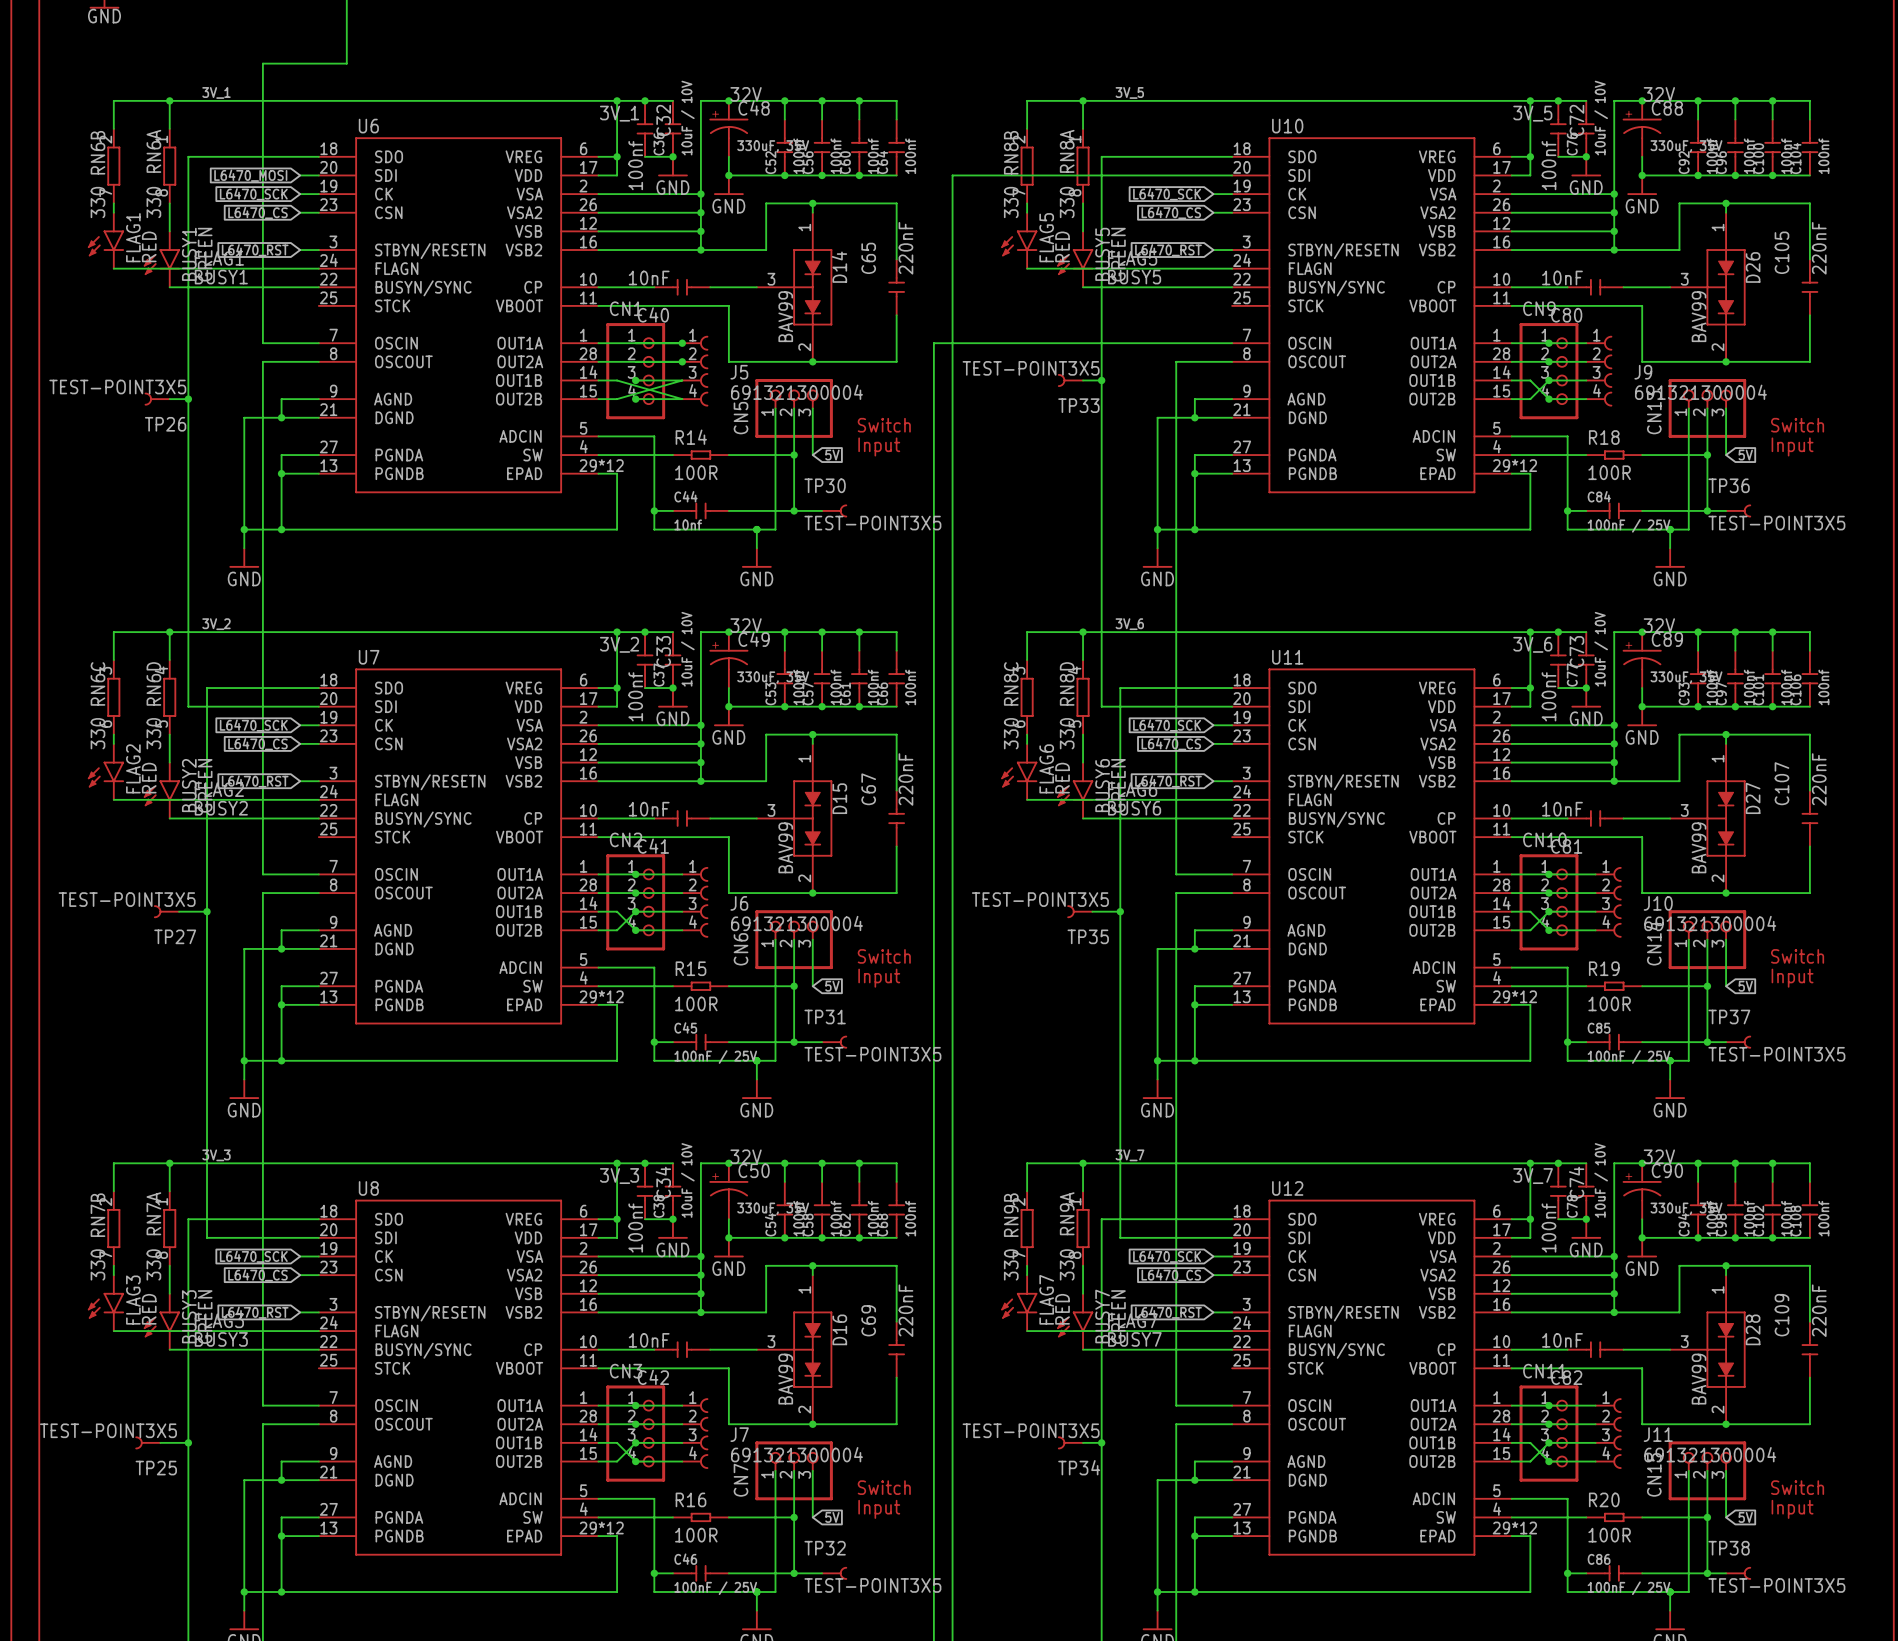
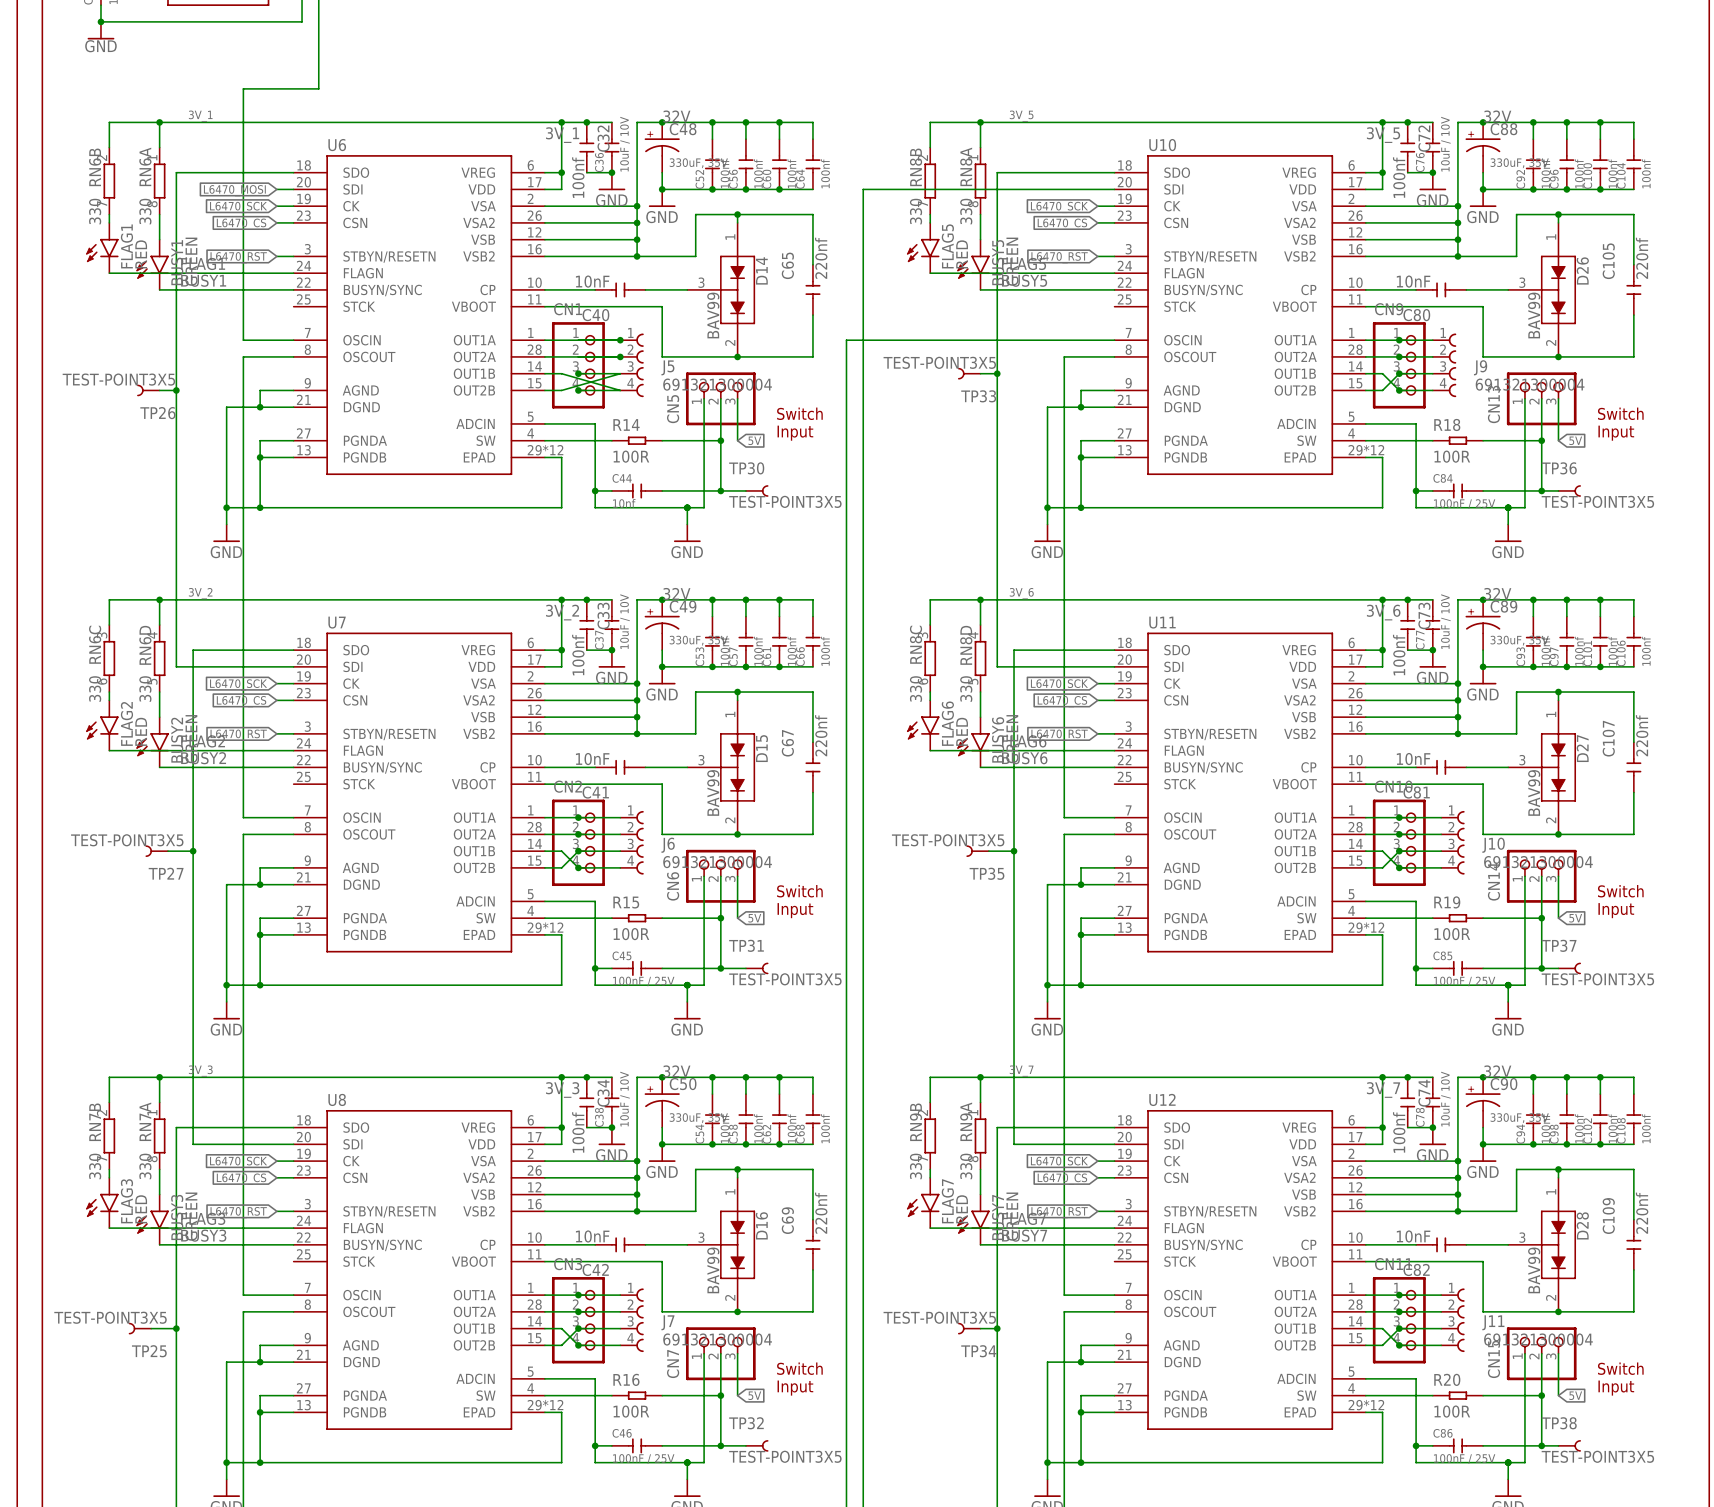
C65 value: 220nF (905, 248) -> 220nf (821, 258)
C105 value: 220nF (1819, 248) -> 220nf (1642, 258)
C67 value: 220nF (905, 779) -> 220nf (821, 735)
C107 value: 220nF (1819, 779) -> 220nf (1642, 735)
C69 value: 220nF (905, 1310) -> 220nf (821, 1213)
C109 value: 220nF (1819, 1310) -> 220nf (1642, 1213)

